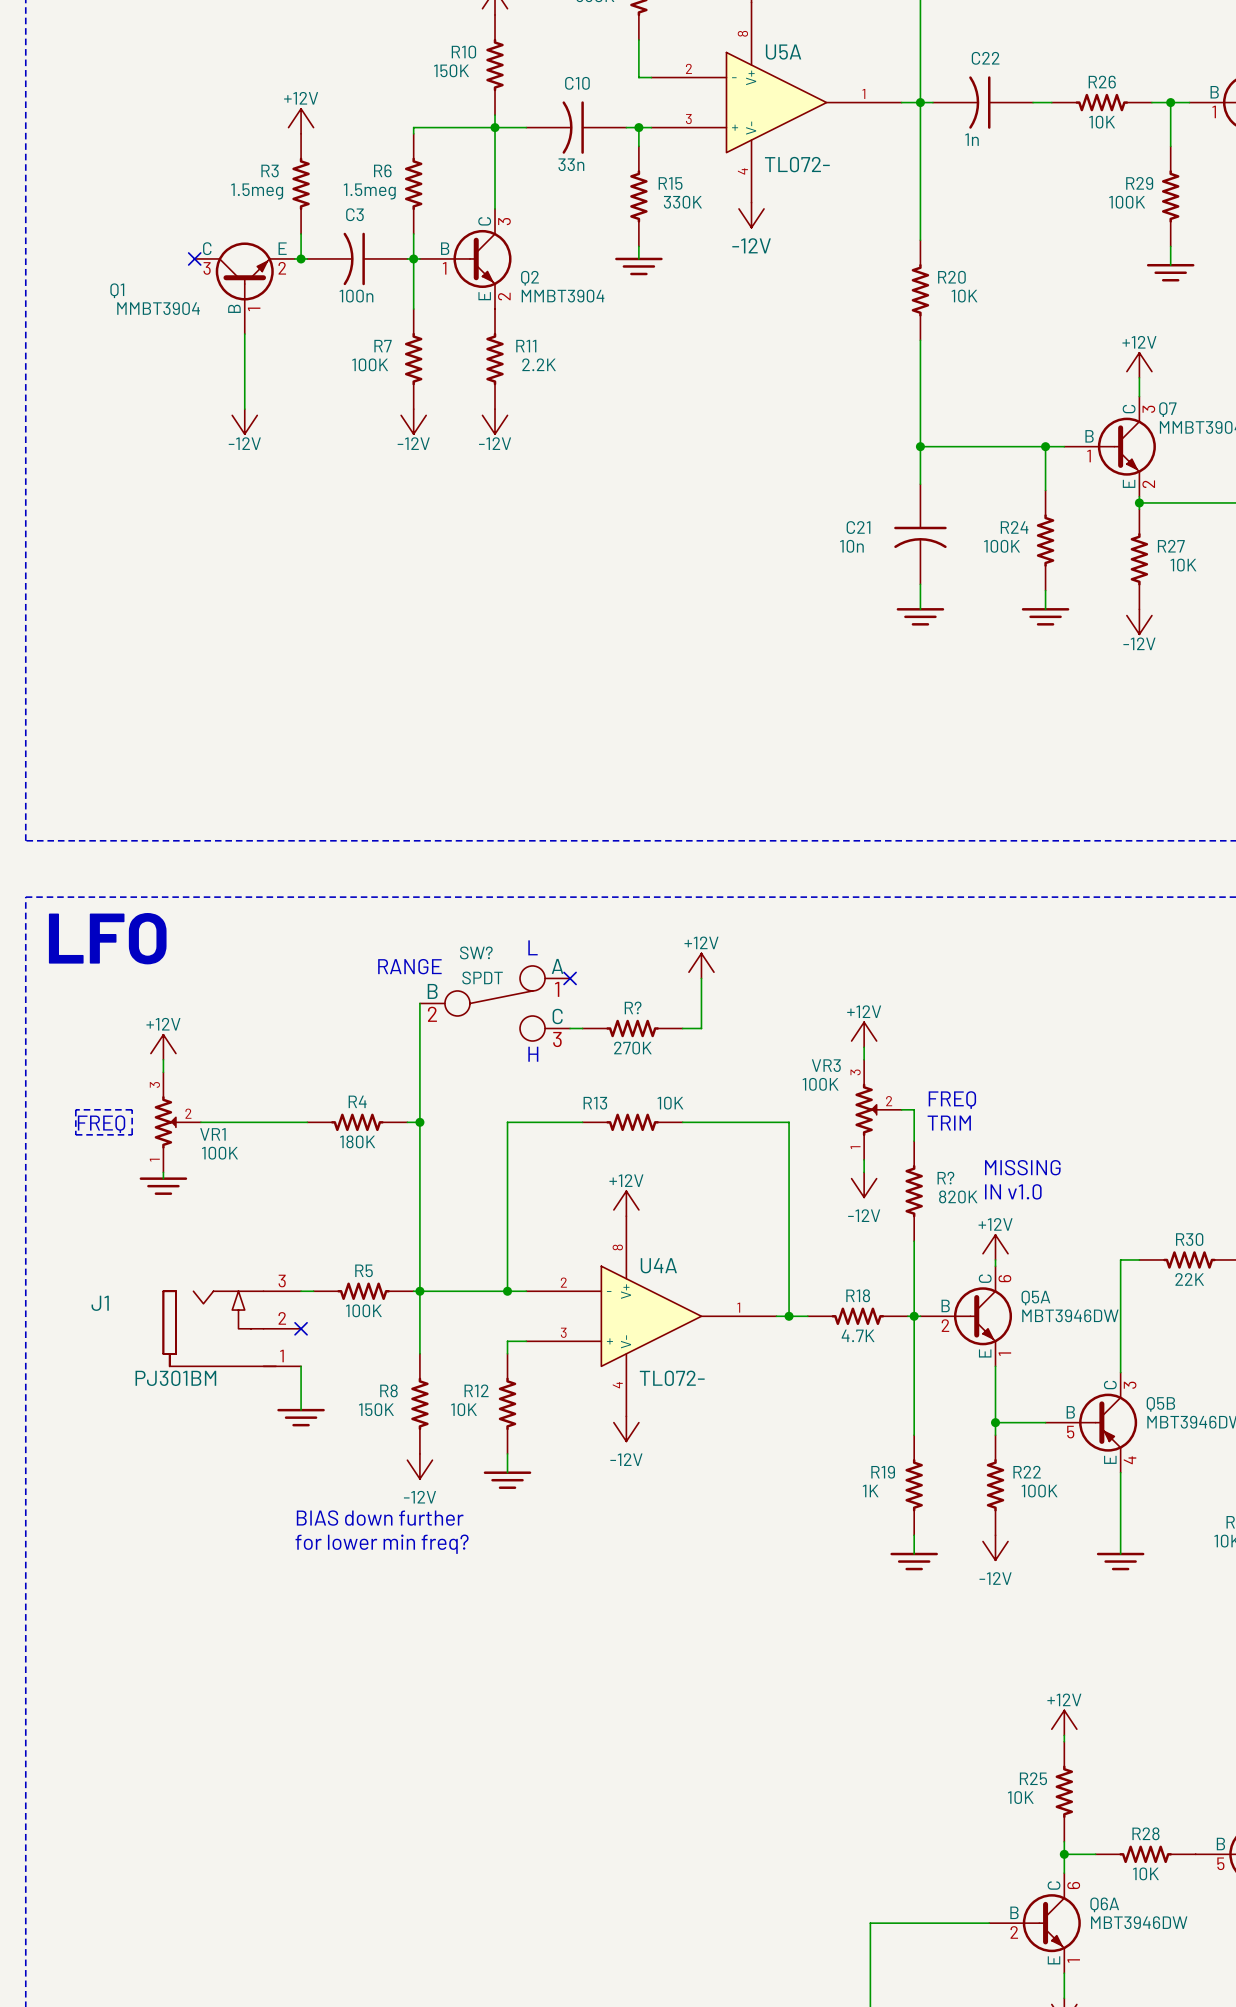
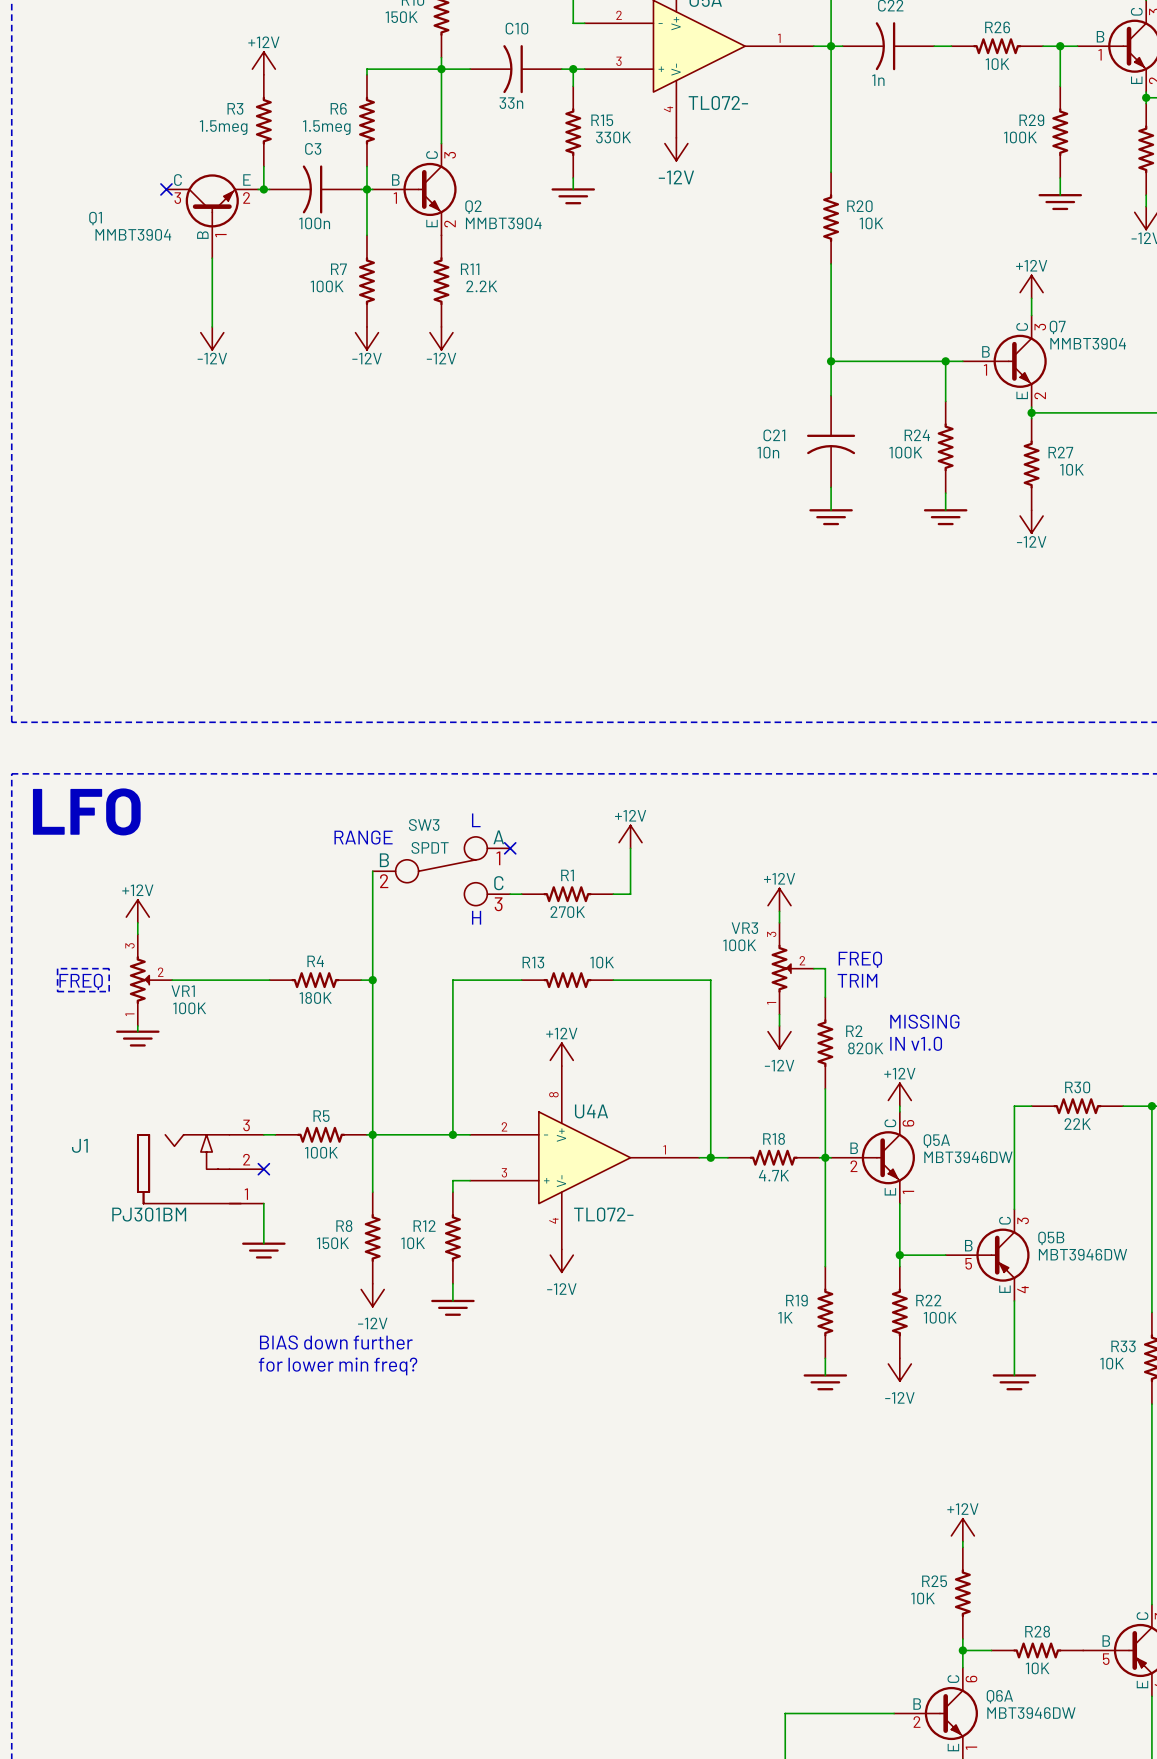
SW? name: SW? (476, 952) -> SW3 (424, 825)
R? name: R? (633, 1007) -> R1 (567, 875)
R? name: R? (945, 1178) -> R2 (854, 1031)

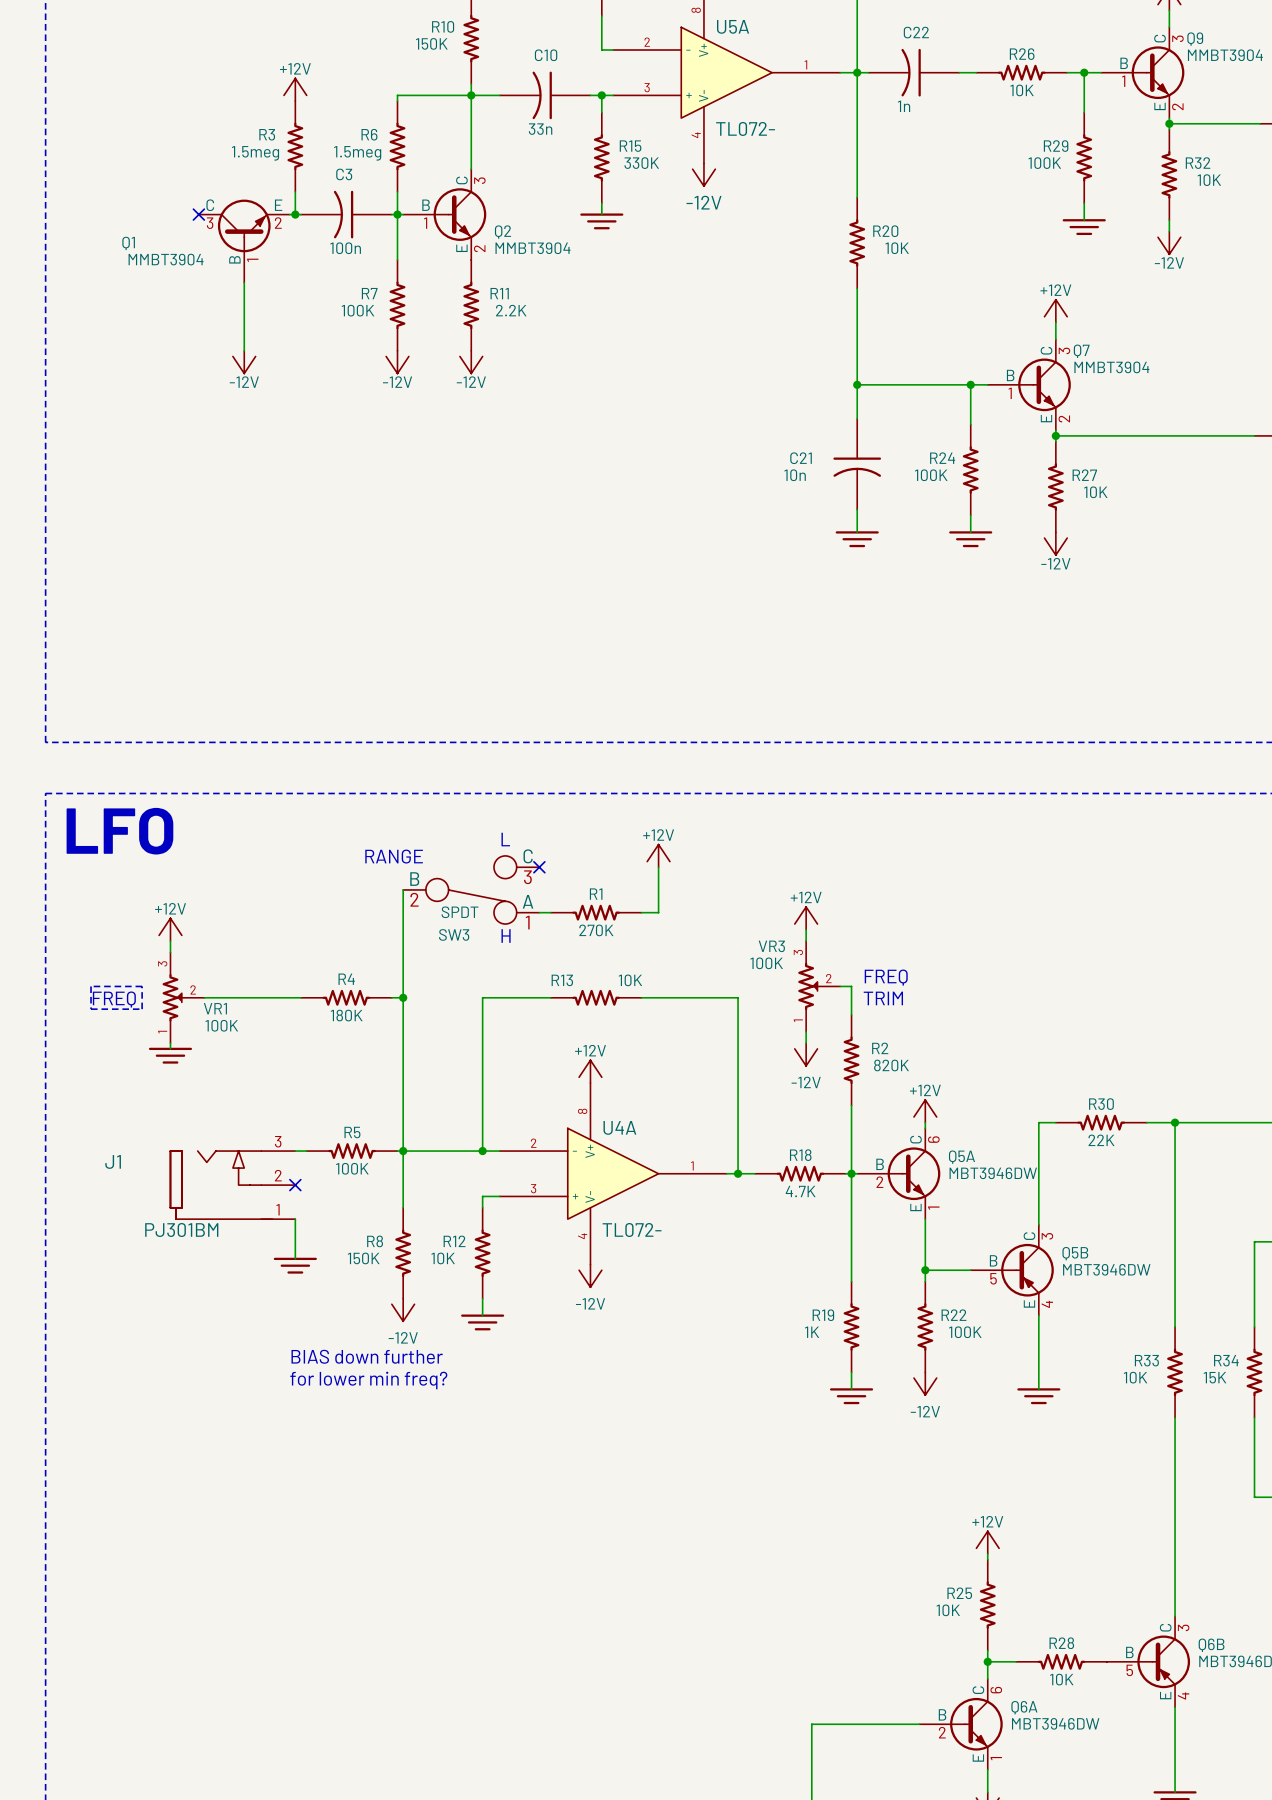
SW3 flip: as is (441, 871) -> up-down (471, 889)
text: MISSING (924, 1021) -> none
text: IN v1.0 (916, 1043) -> none

